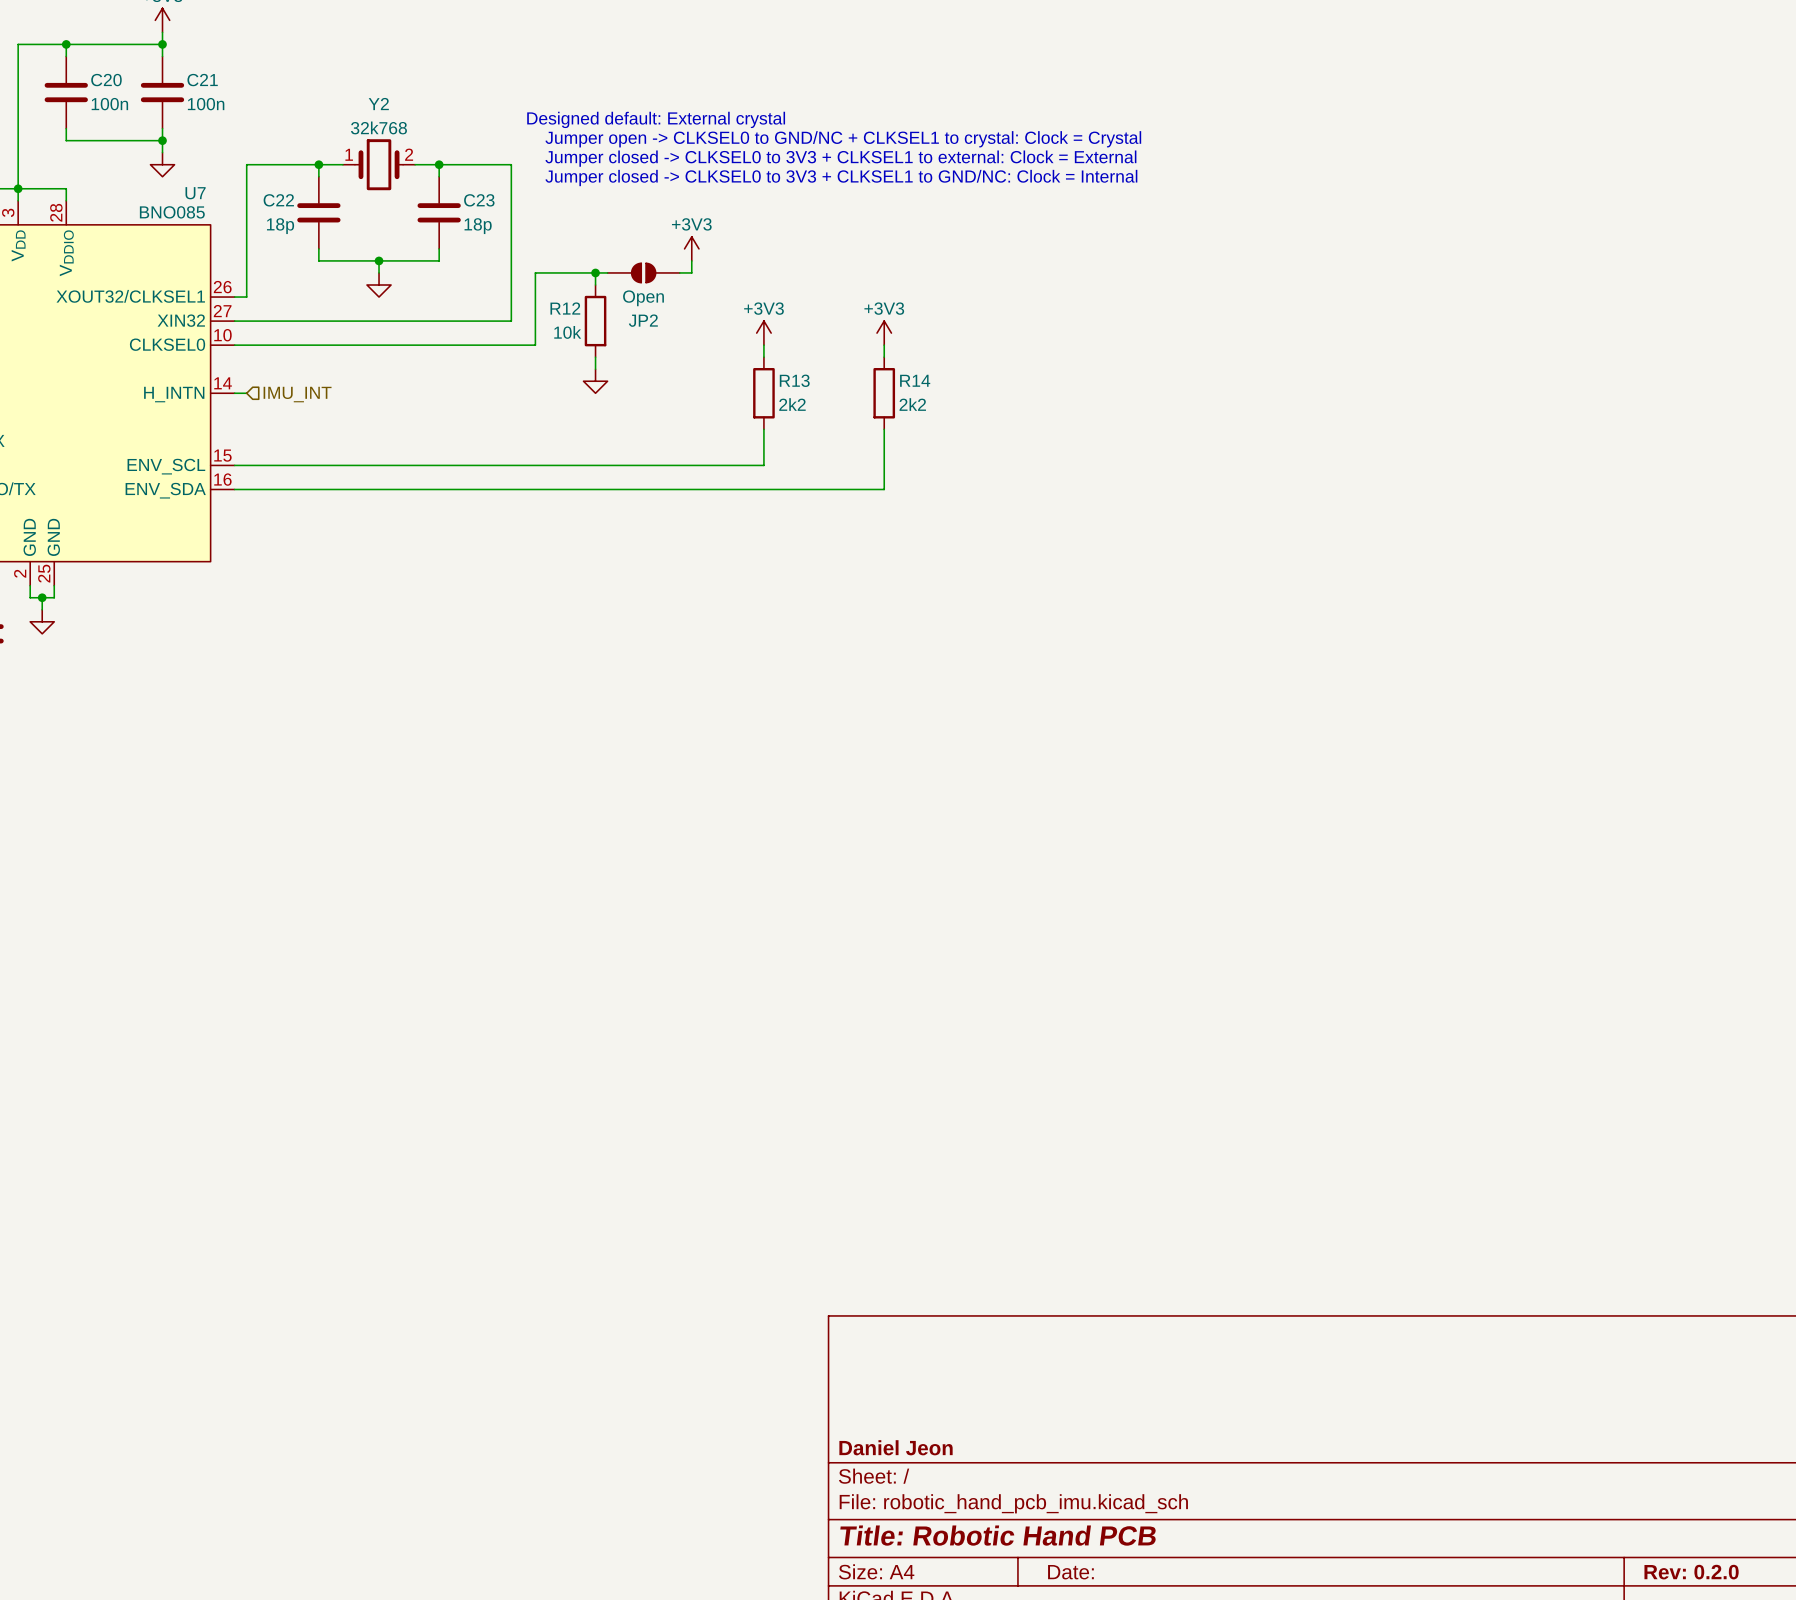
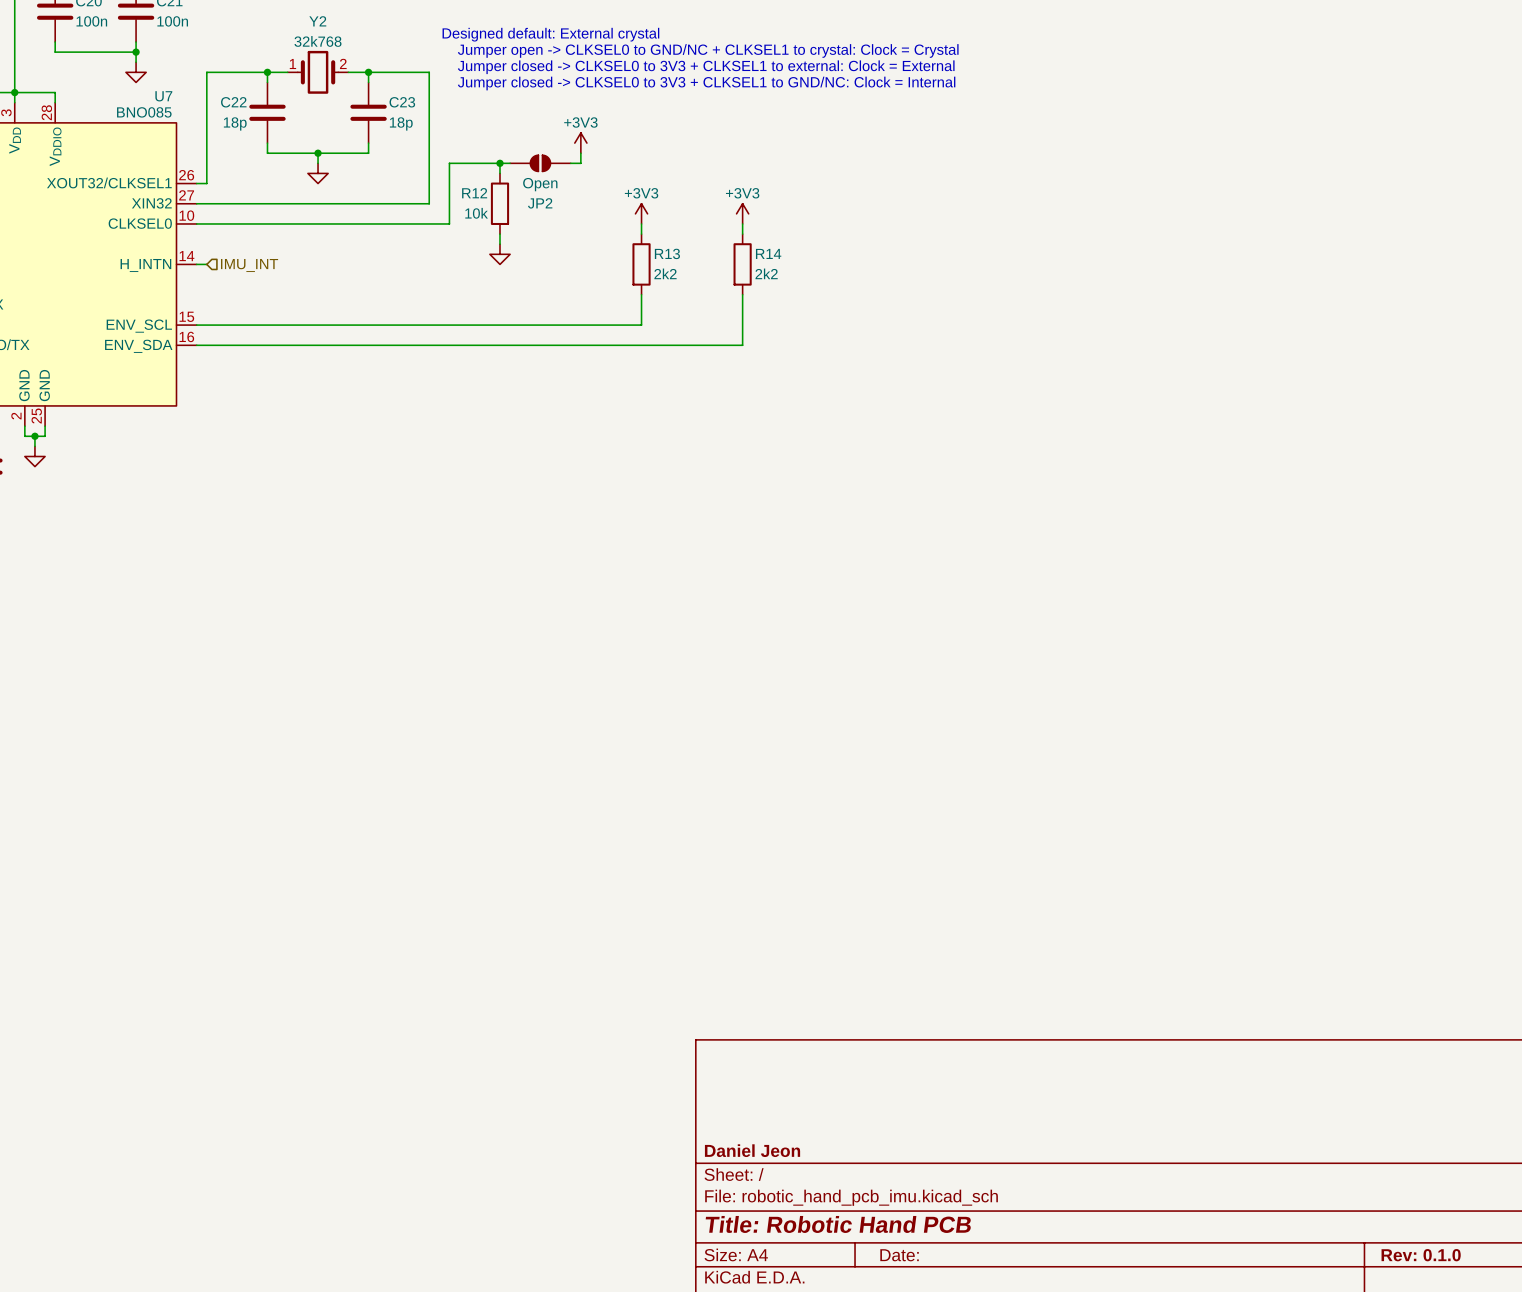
title block: Rev: 0.2.0 (1691, 1572) -> Rev: 0.1.0 (1421, 1255)

